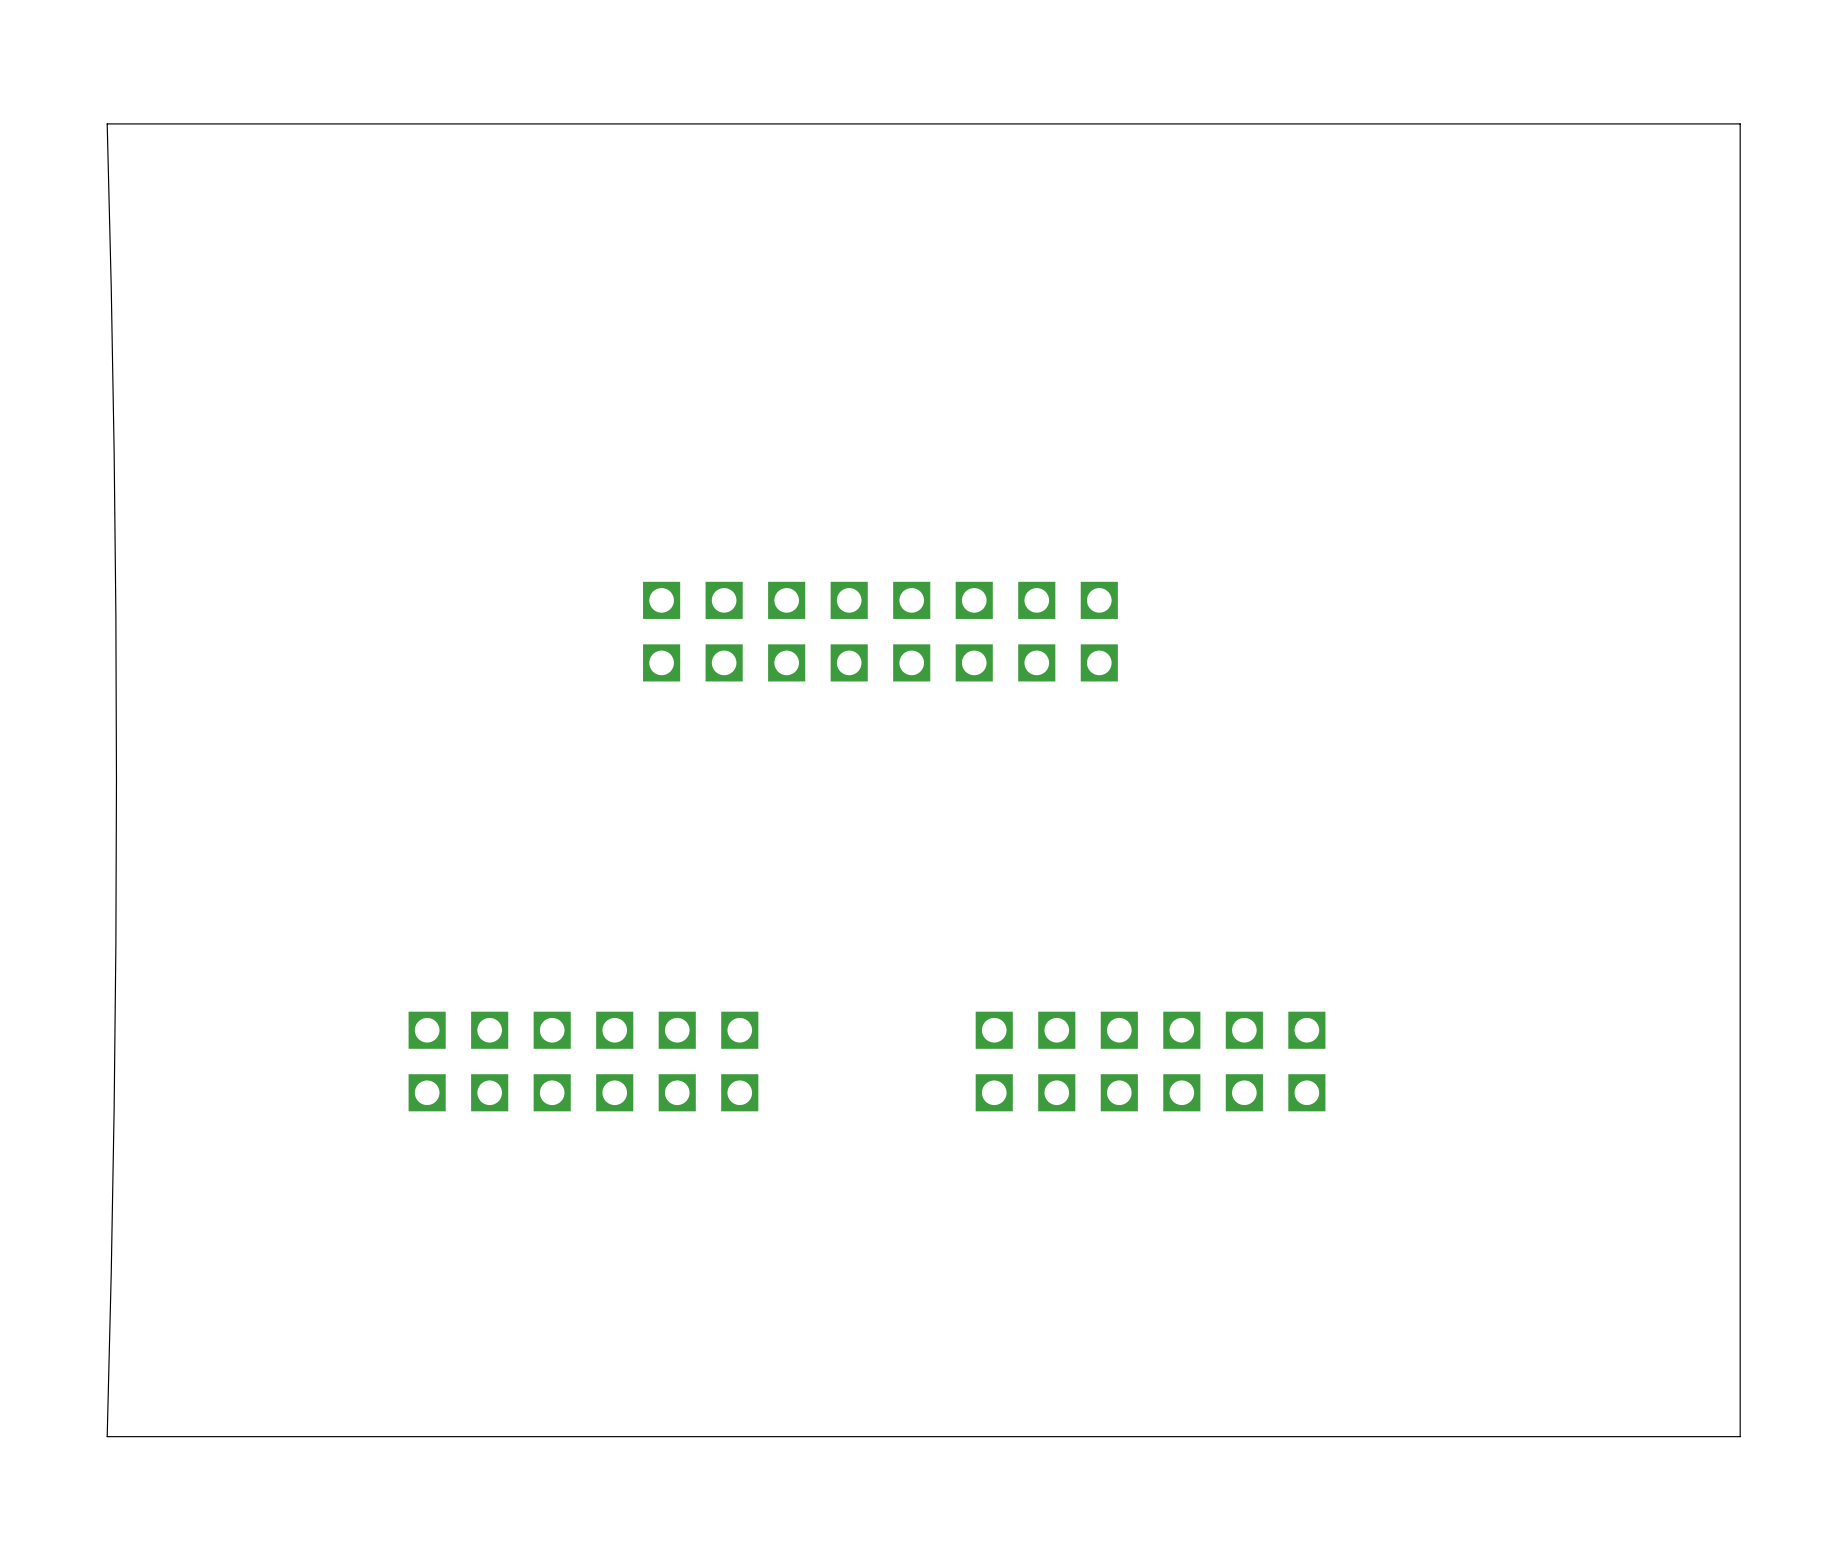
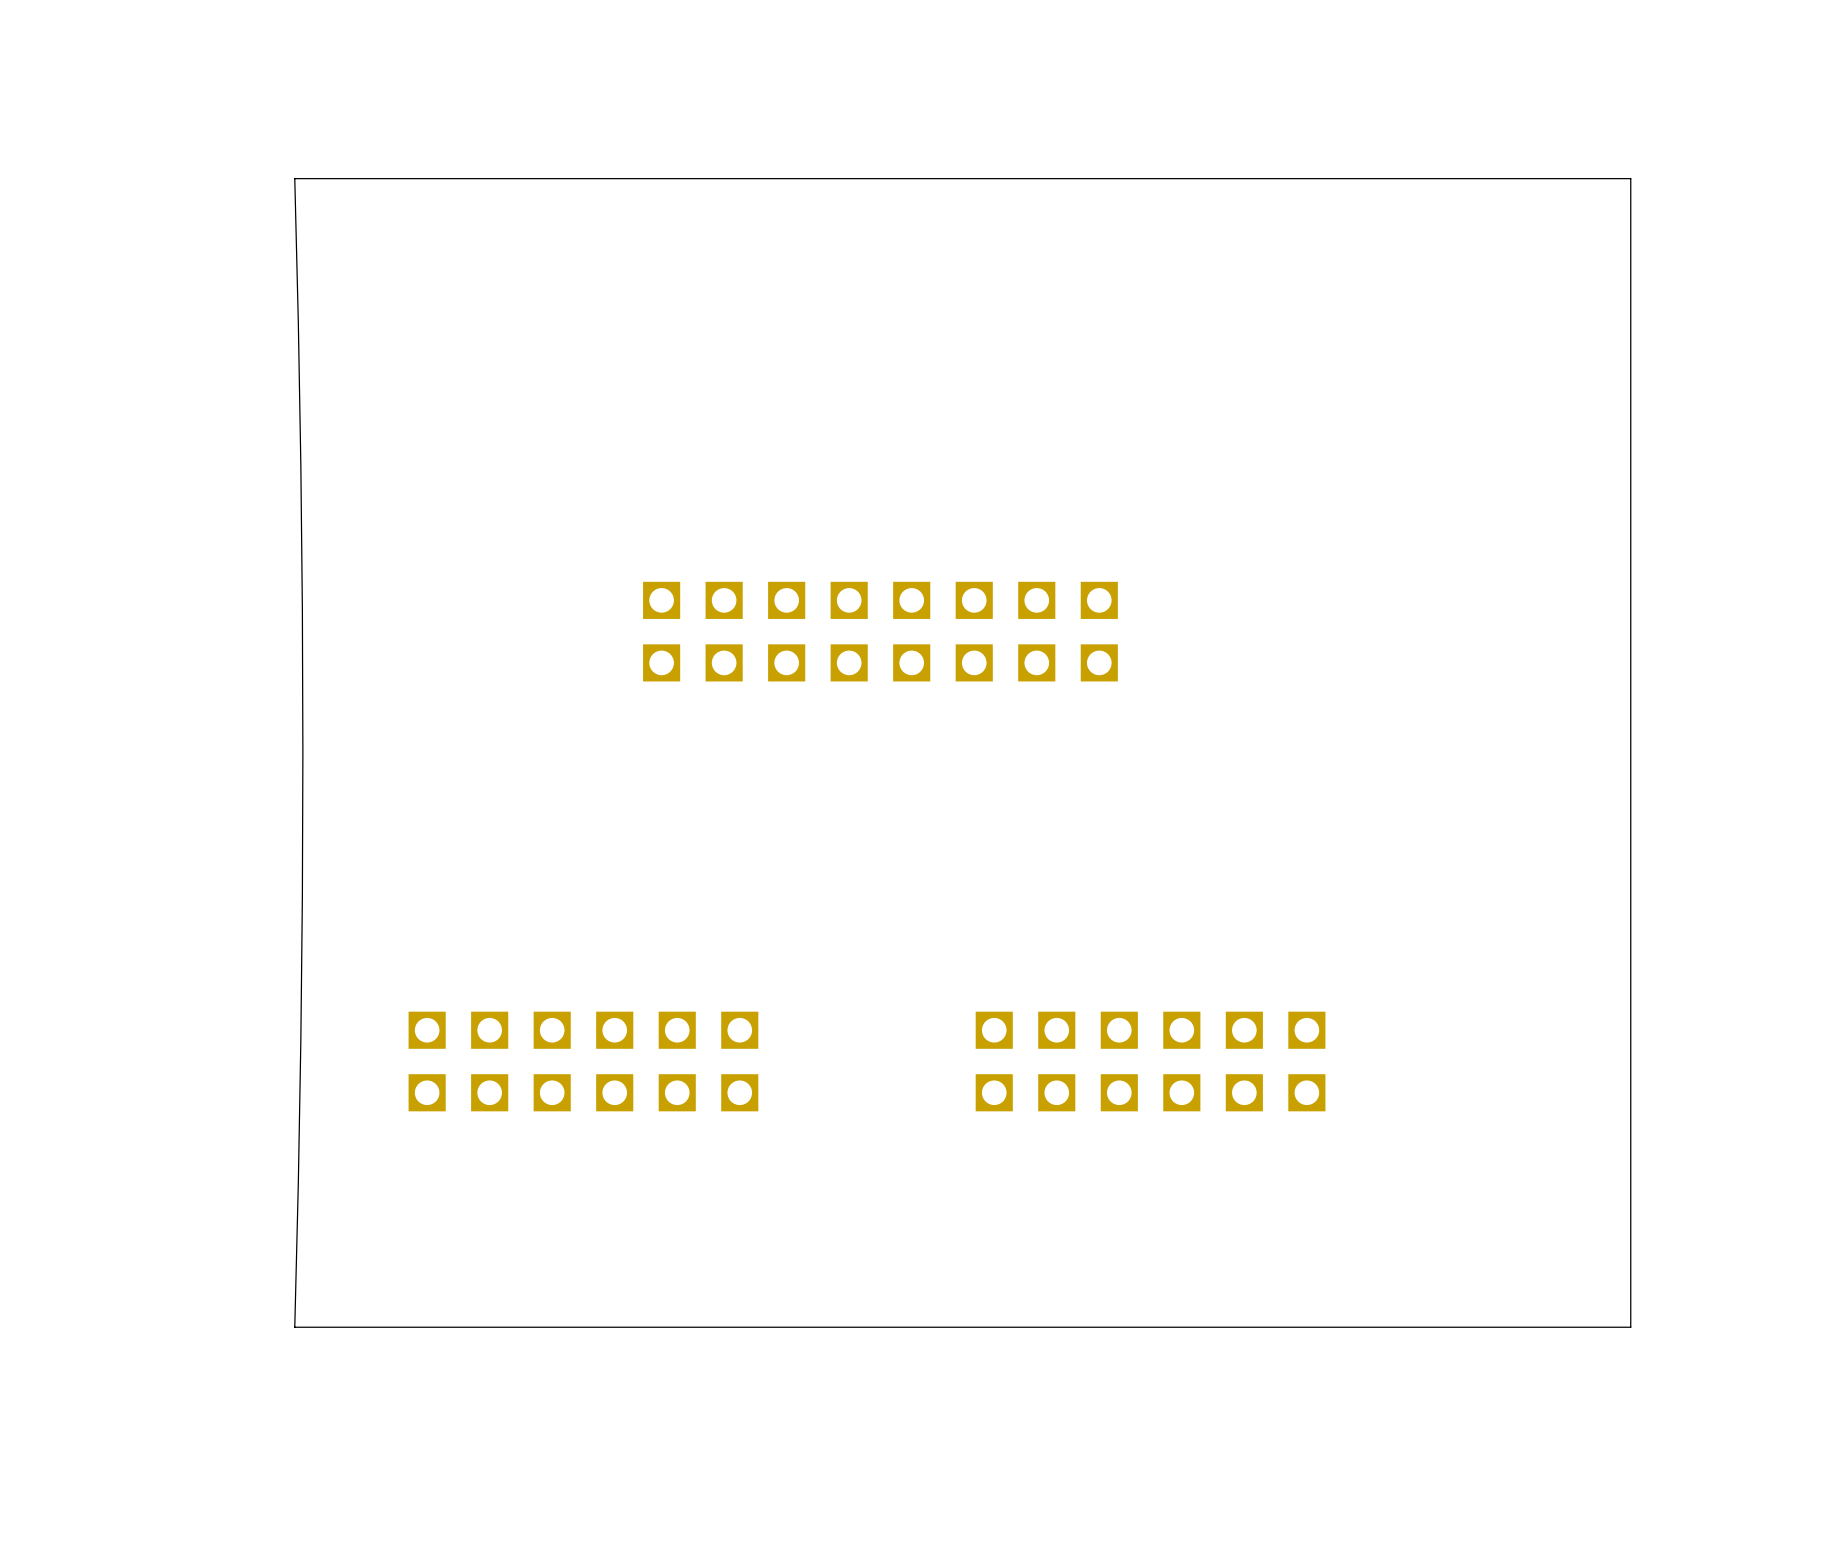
board edge: (1740, 123) (107, 123) (114, 452) (116, 780) (114, 1108) (107, 1436) (1740, 1436) (1740, 123) -> (1630, 178) (1630, 1327) (294, 1327) (300, 1040) (302, 752) (300, 465) (294, 178) (1630, 178)

